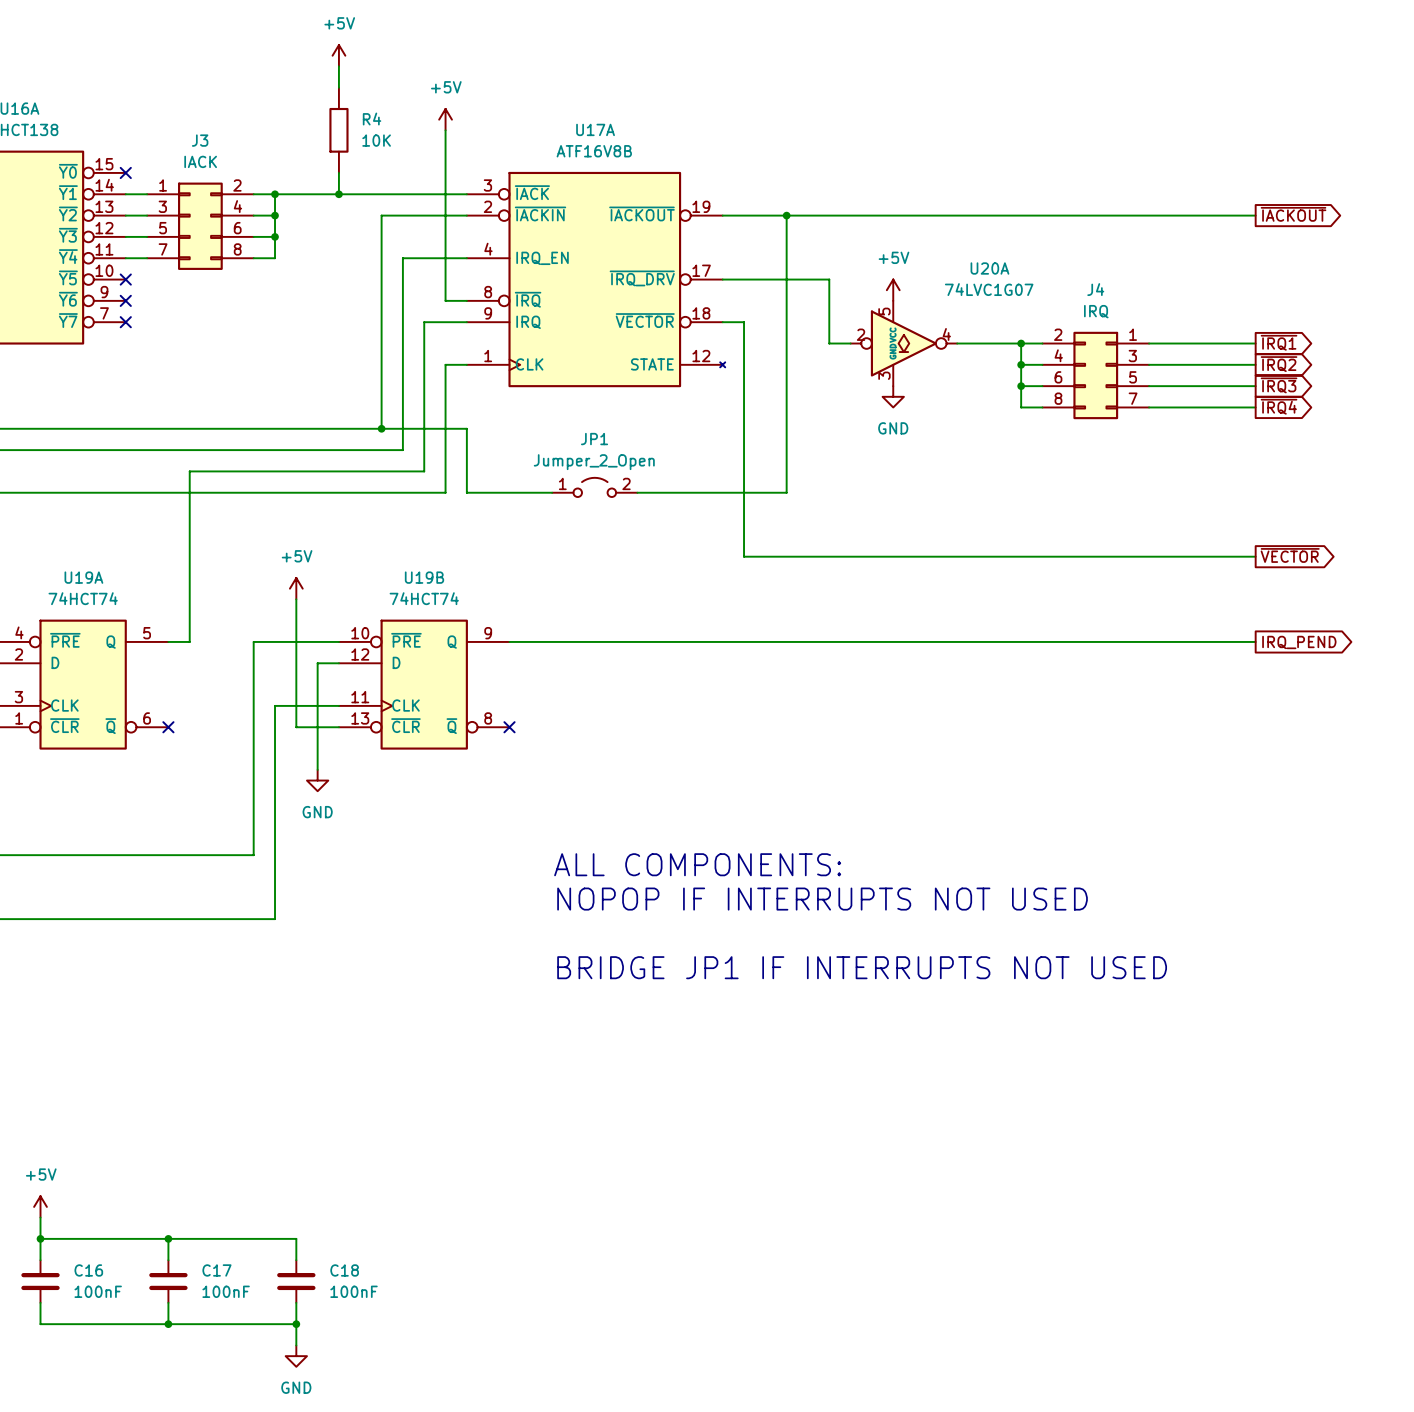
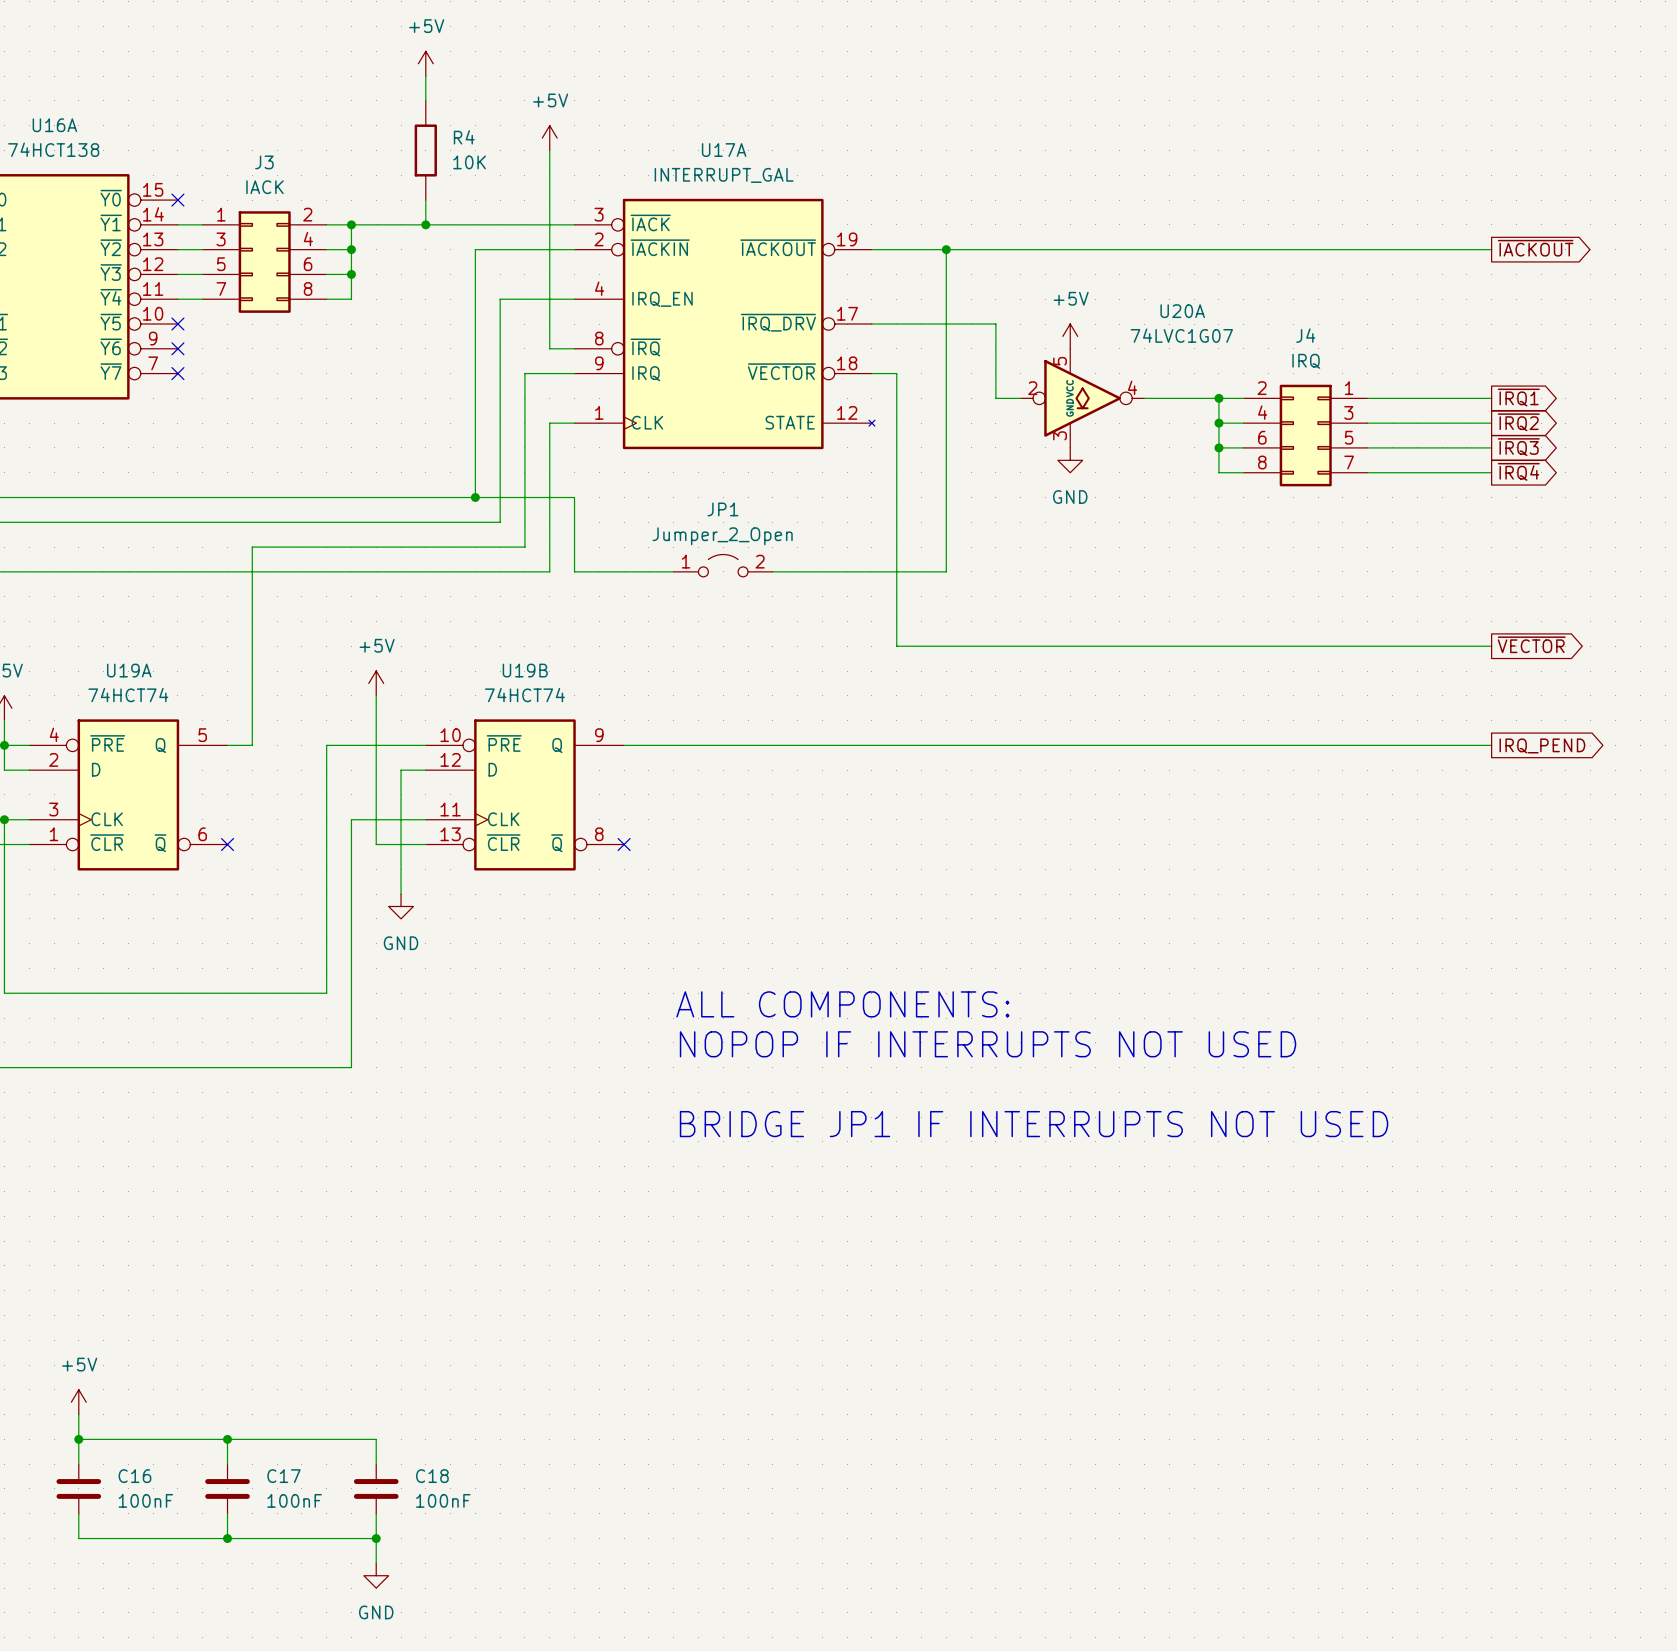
U17A value: ATF16V8B (594, 151) -> INTERRUPT_GAL (724, 175)

